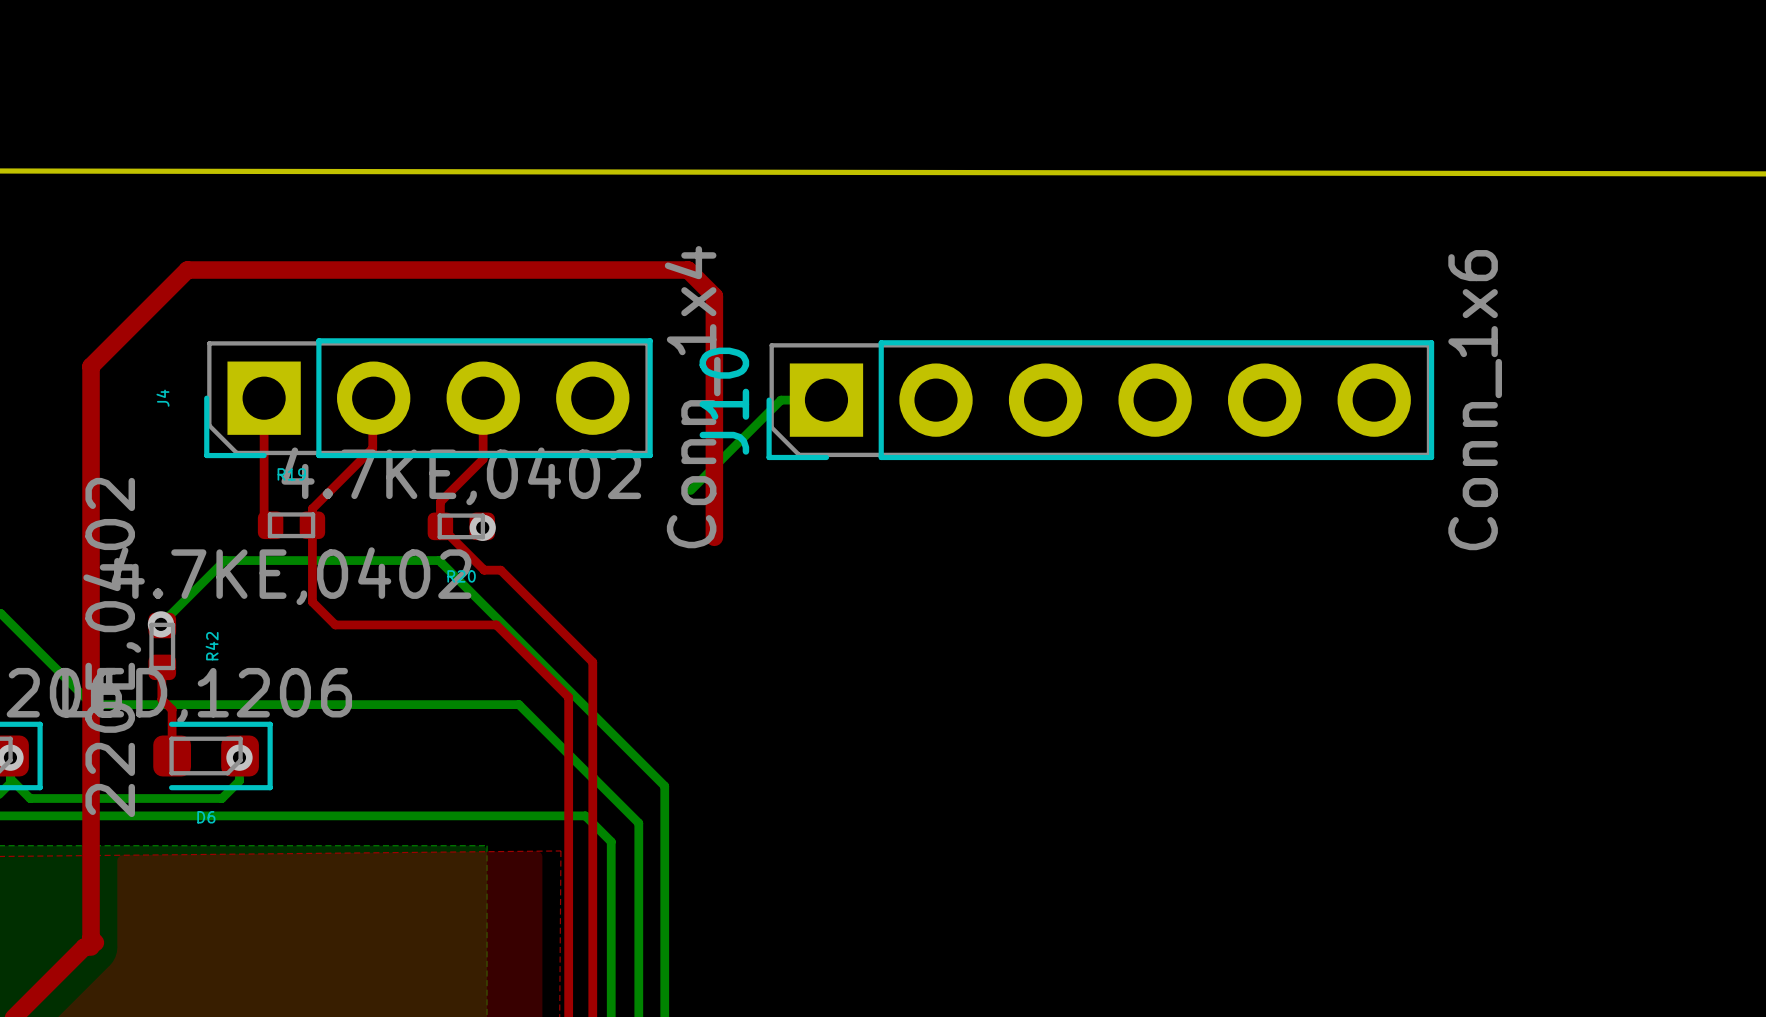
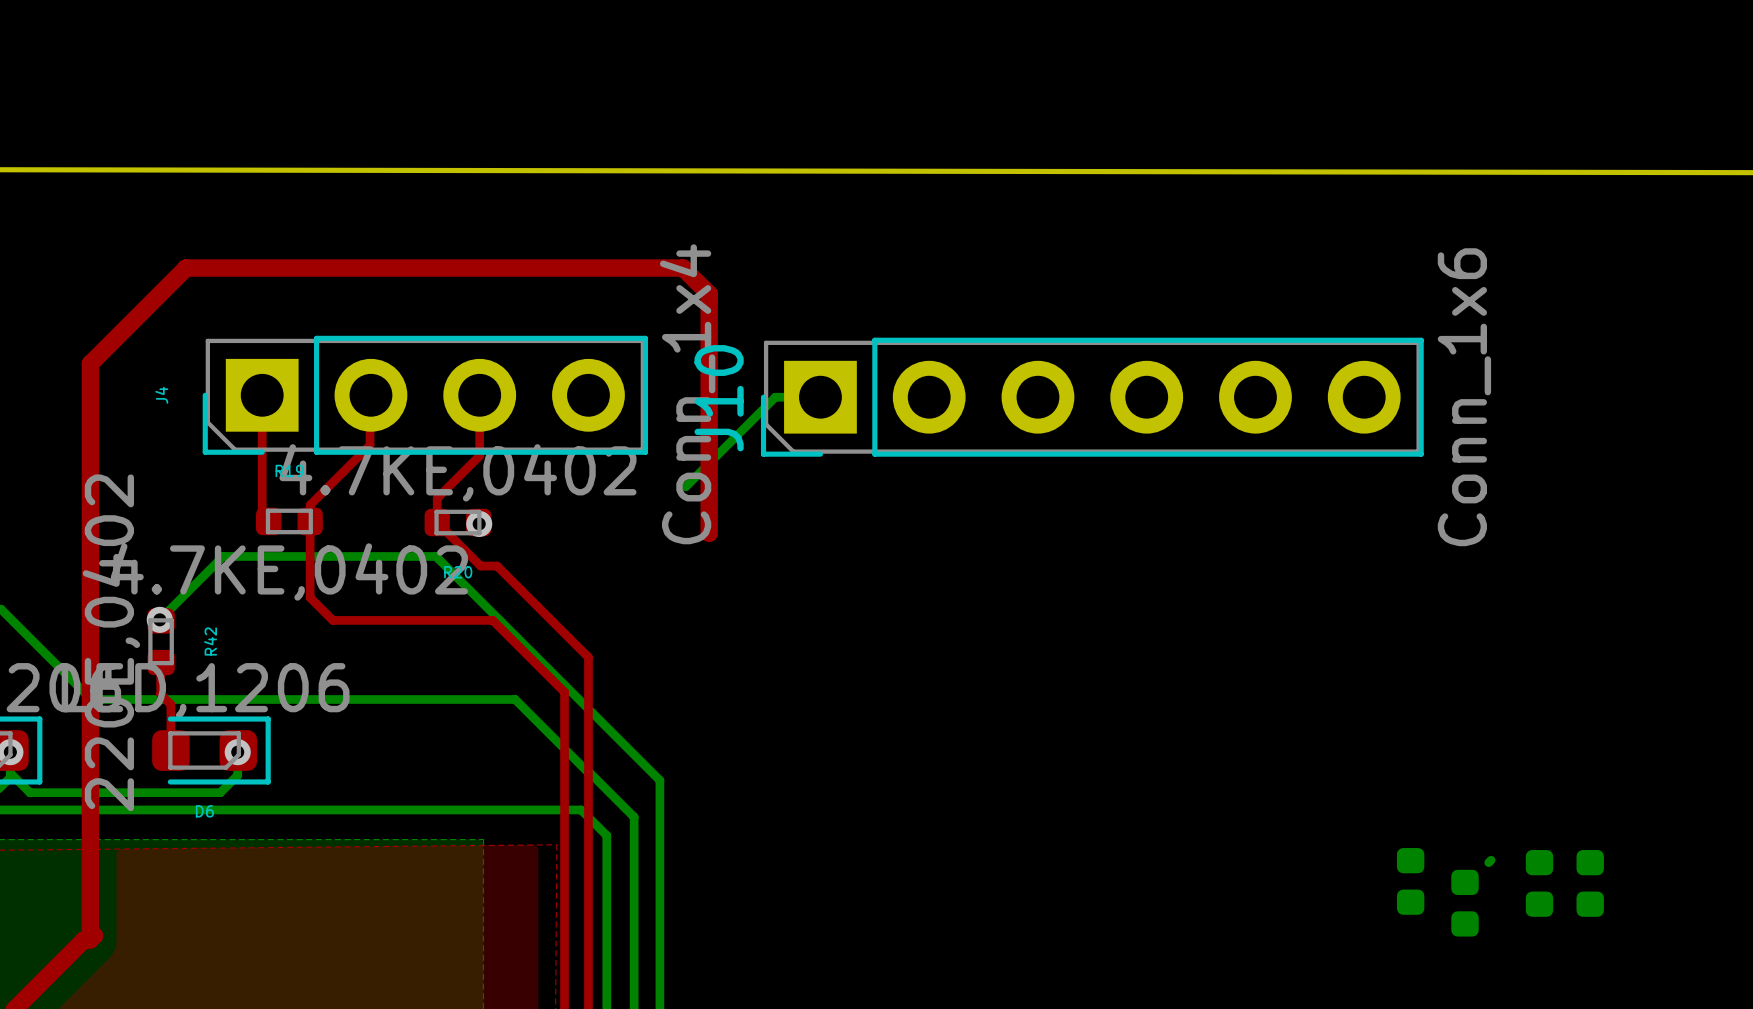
bottom track: none -> (1491, 860) (1488, 862)
part: none -> (1410, 881)
part: none -> (1539, 883)
part: none -> (1590, 883)
part: none -> (1465, 903)

